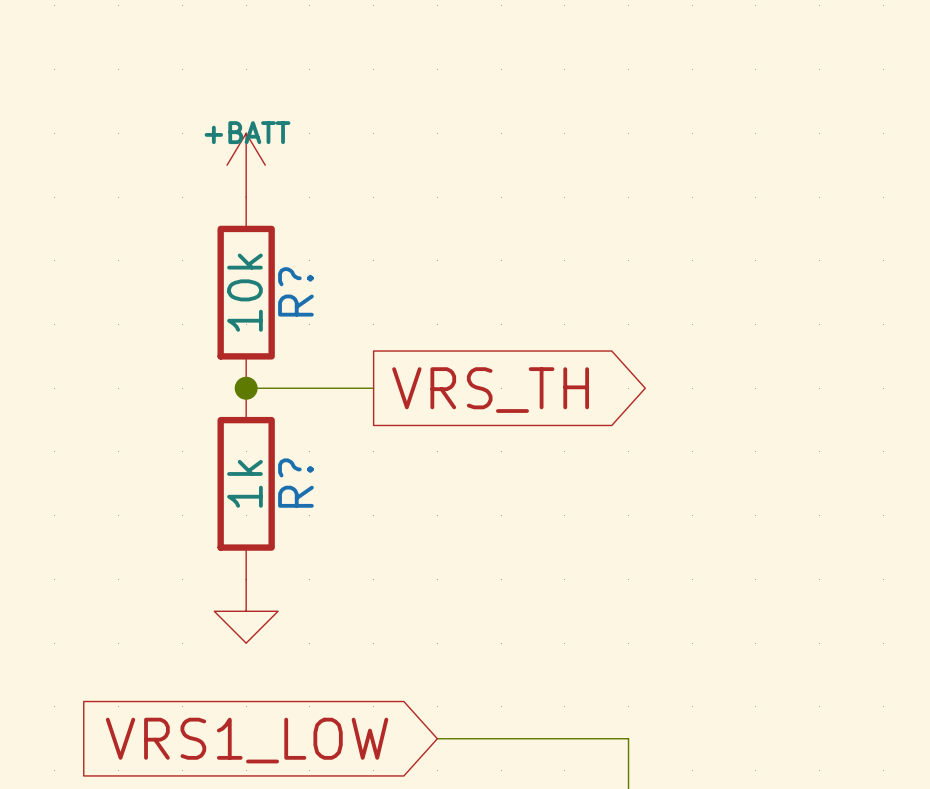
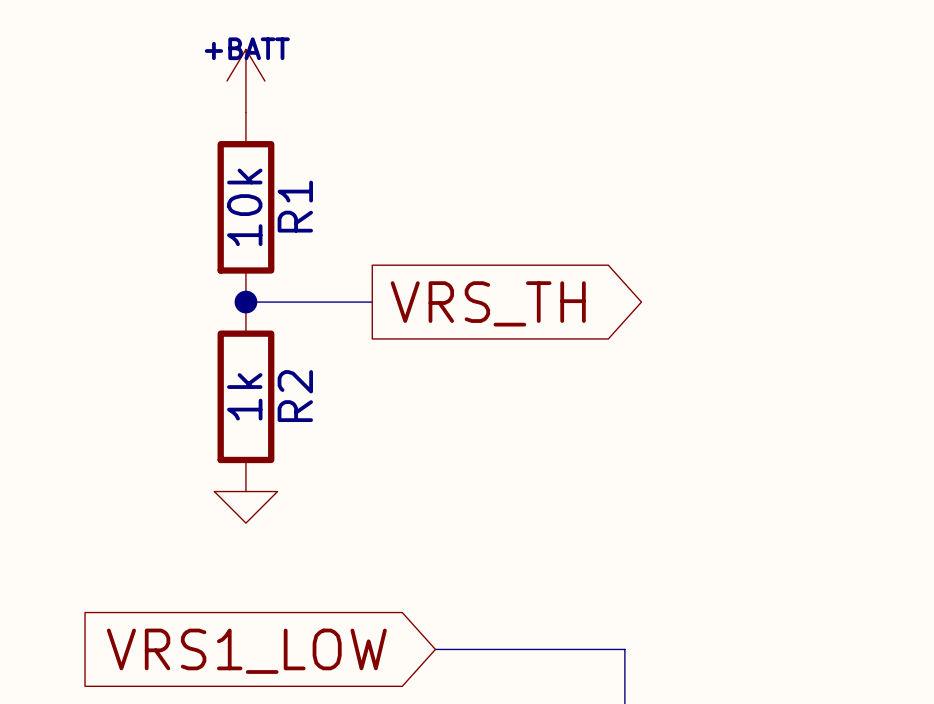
R? name: R? (295, 291) -> R1 (295, 206)
R? name: R? (295, 483) -> R2 (295, 396)
power symbol shape: [214, 579, 279, 644] -> [214, 491, 278, 524]

